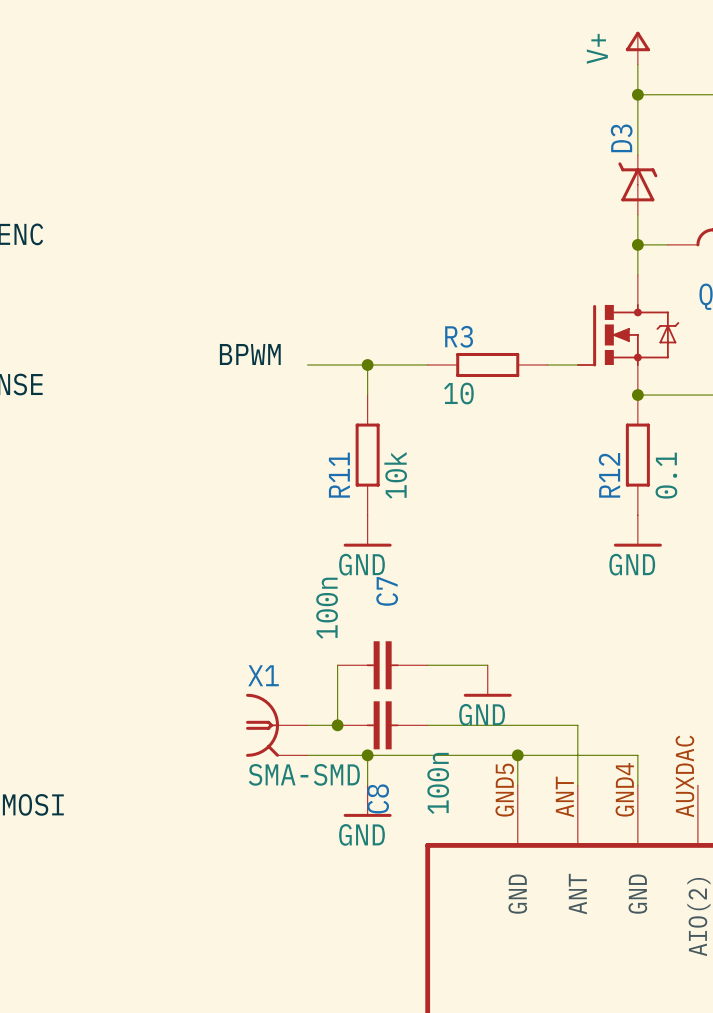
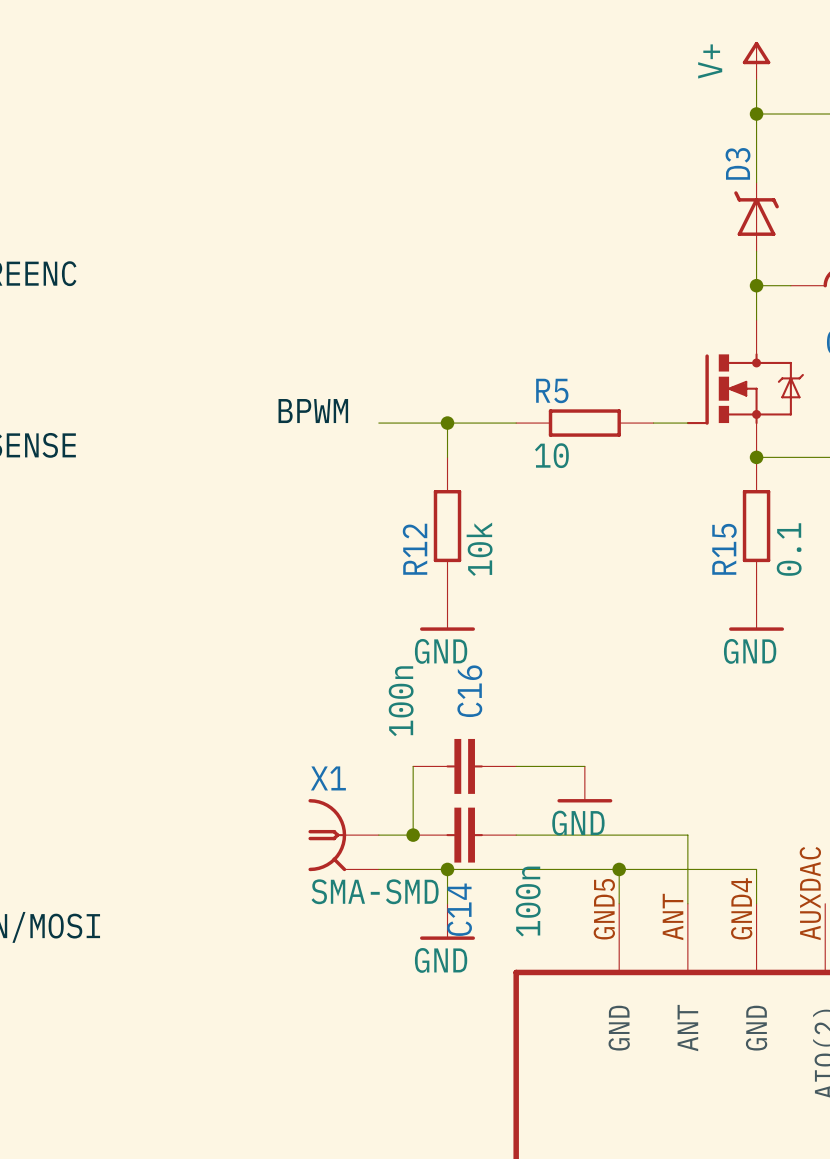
R3 name: R3 (459, 336) -> R5 (552, 390)
R11 name: R11 (339, 475) -> R12 (415, 549)
R12 name: R12 (609, 475) -> R15 (724, 549)
C7 name: C7 (387, 591) -> C16 (469, 691)
C8 name: C8 (378, 798) -> C14 (459, 909)

